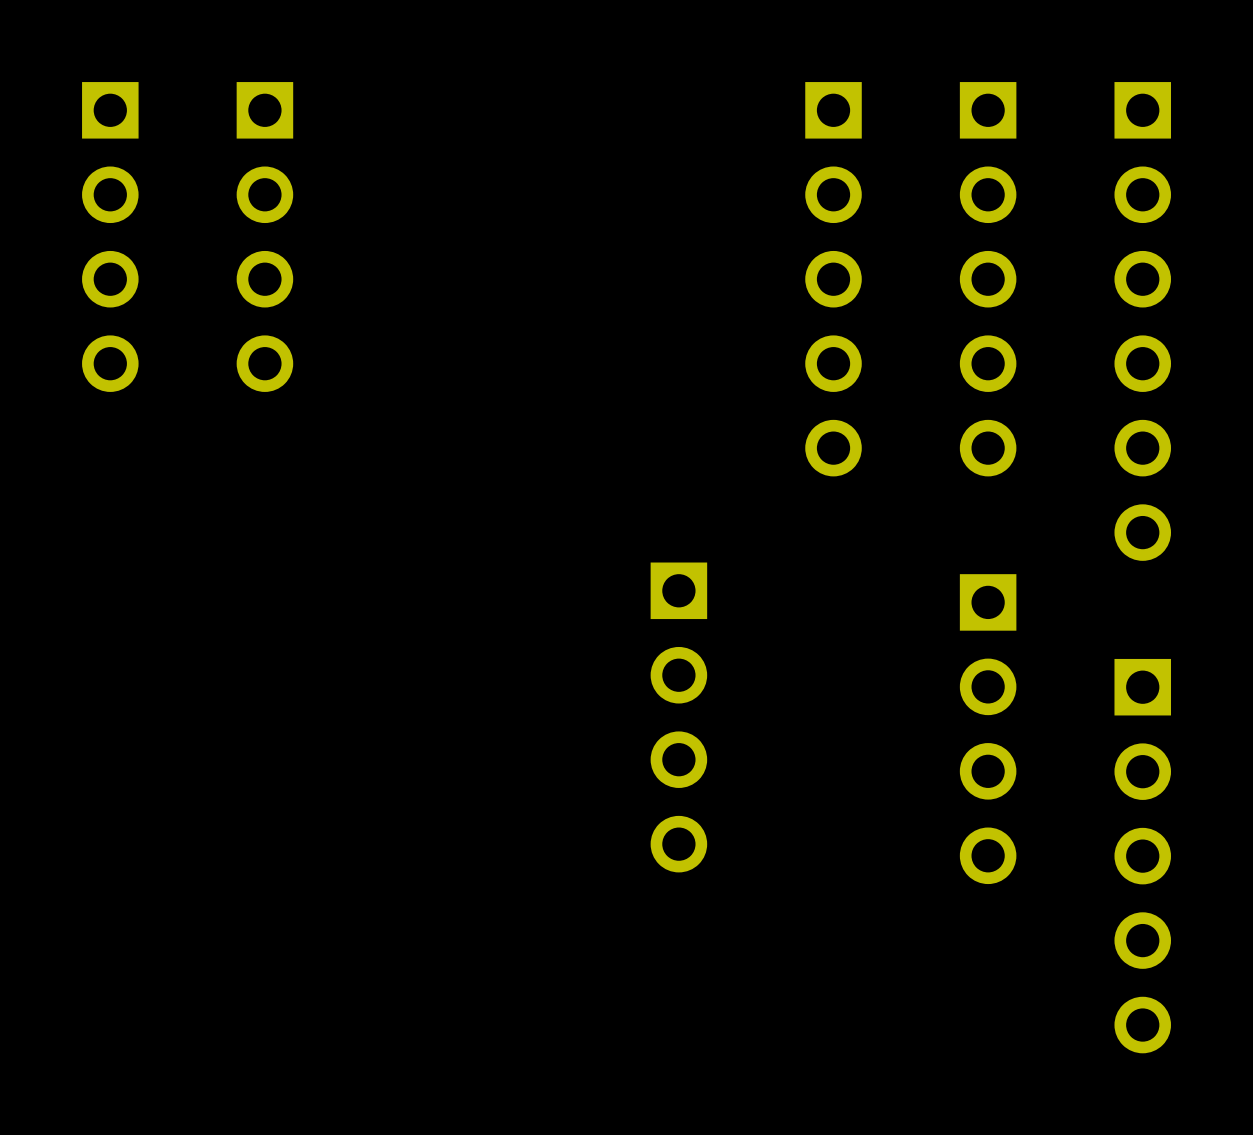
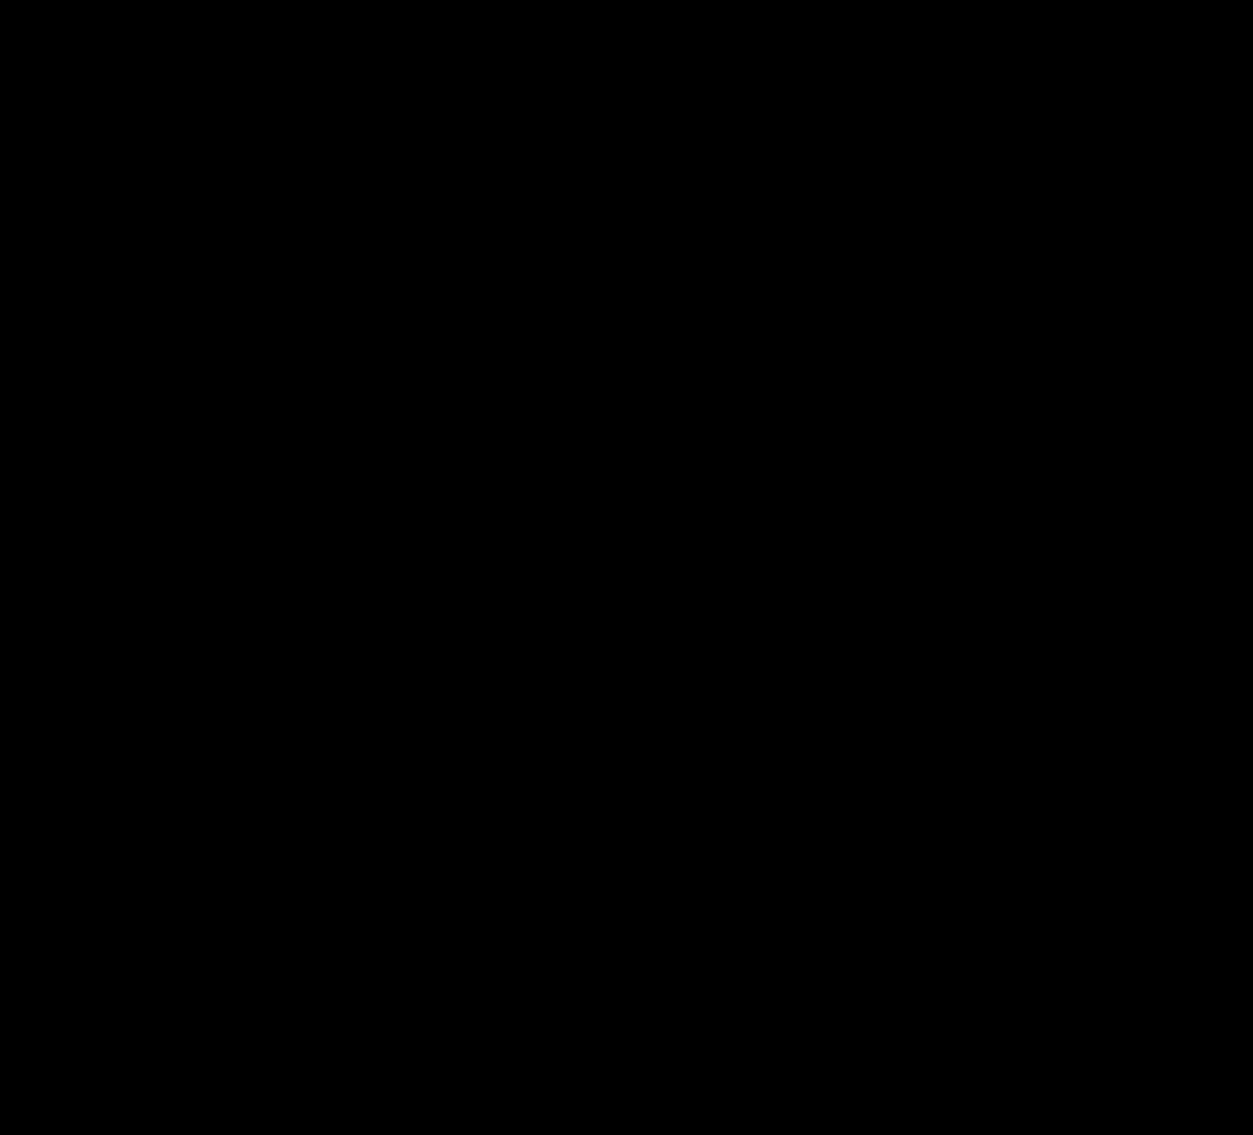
part: (110, 236) -> none
part: (264, 236) -> none
part: (833, 279) -> none
part: (988, 279) -> none
part: (1142, 321) -> none
part: (678, 717) -> none
part: (988, 729) -> none
part: (1142, 856) -> none

